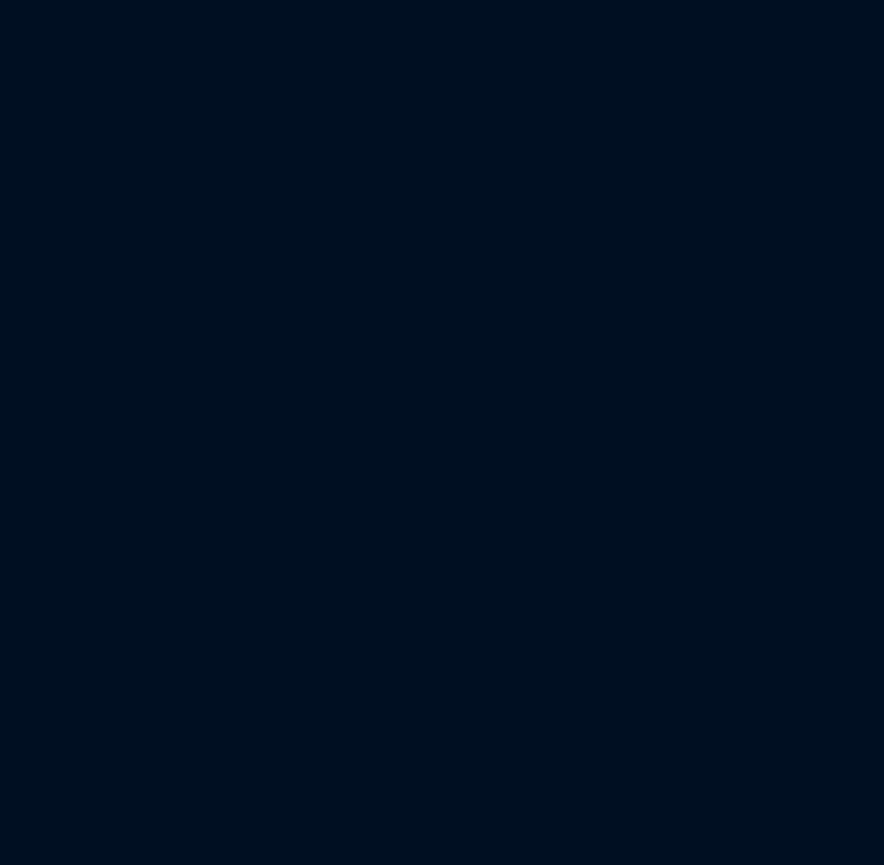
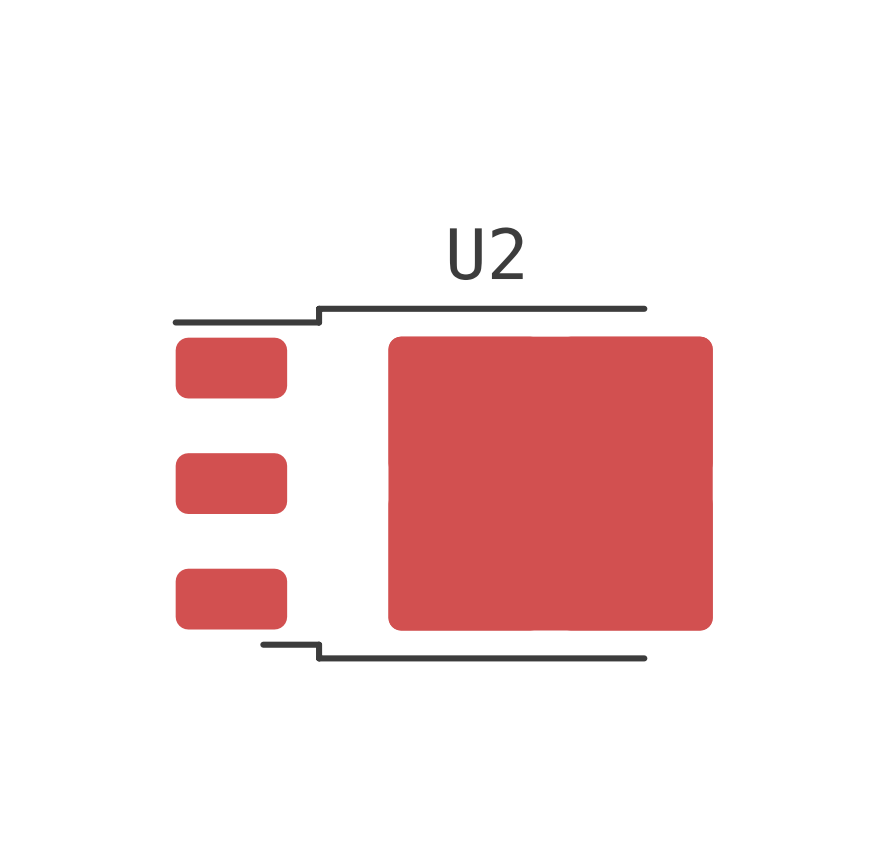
U2: none -> (442, 483)

